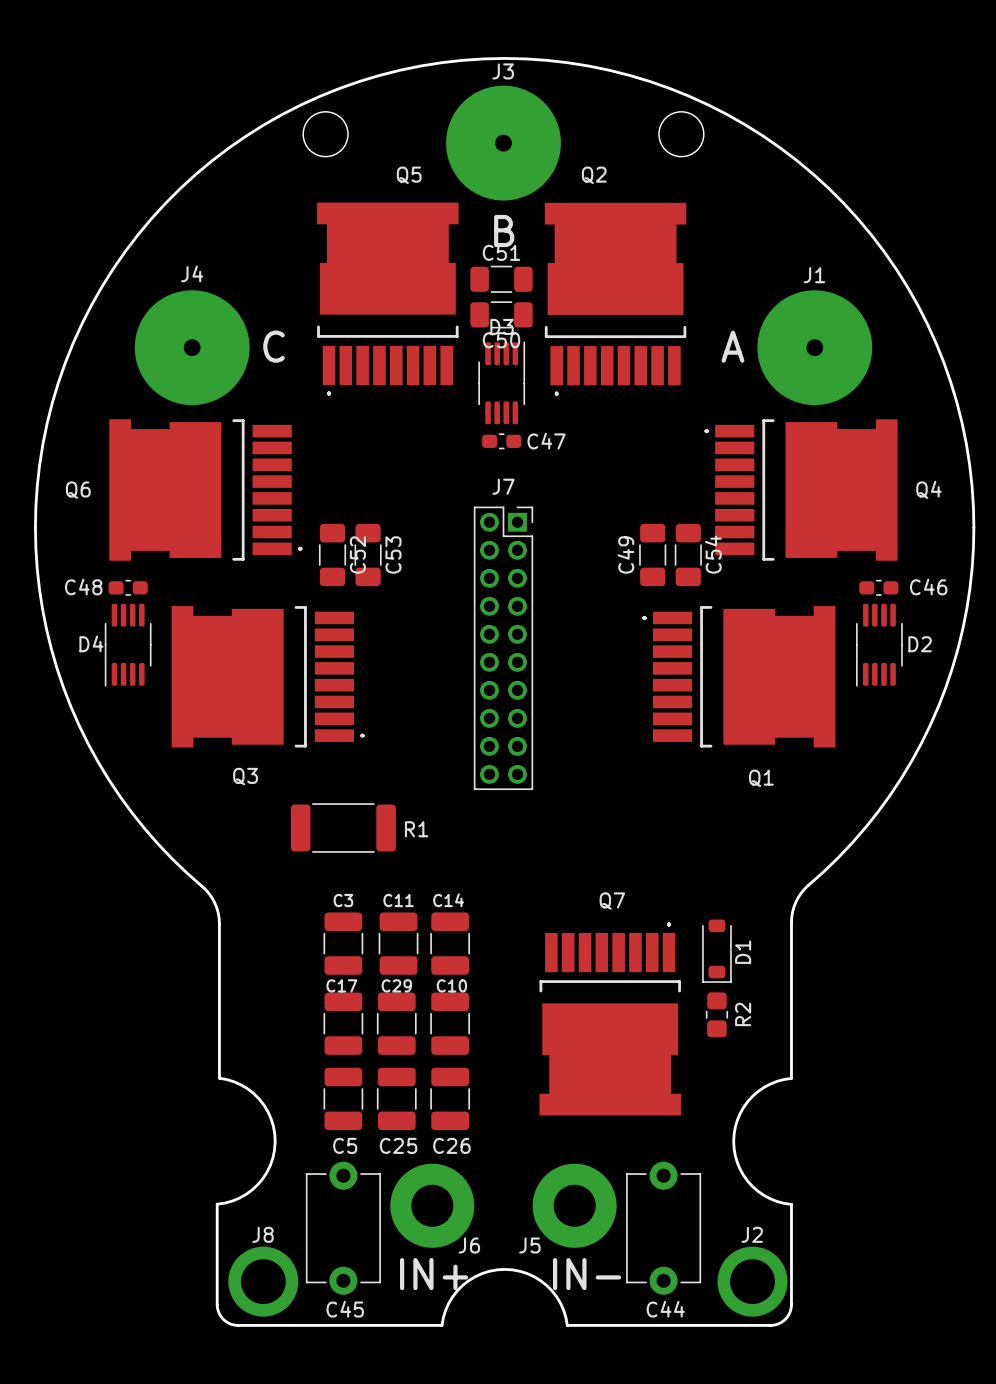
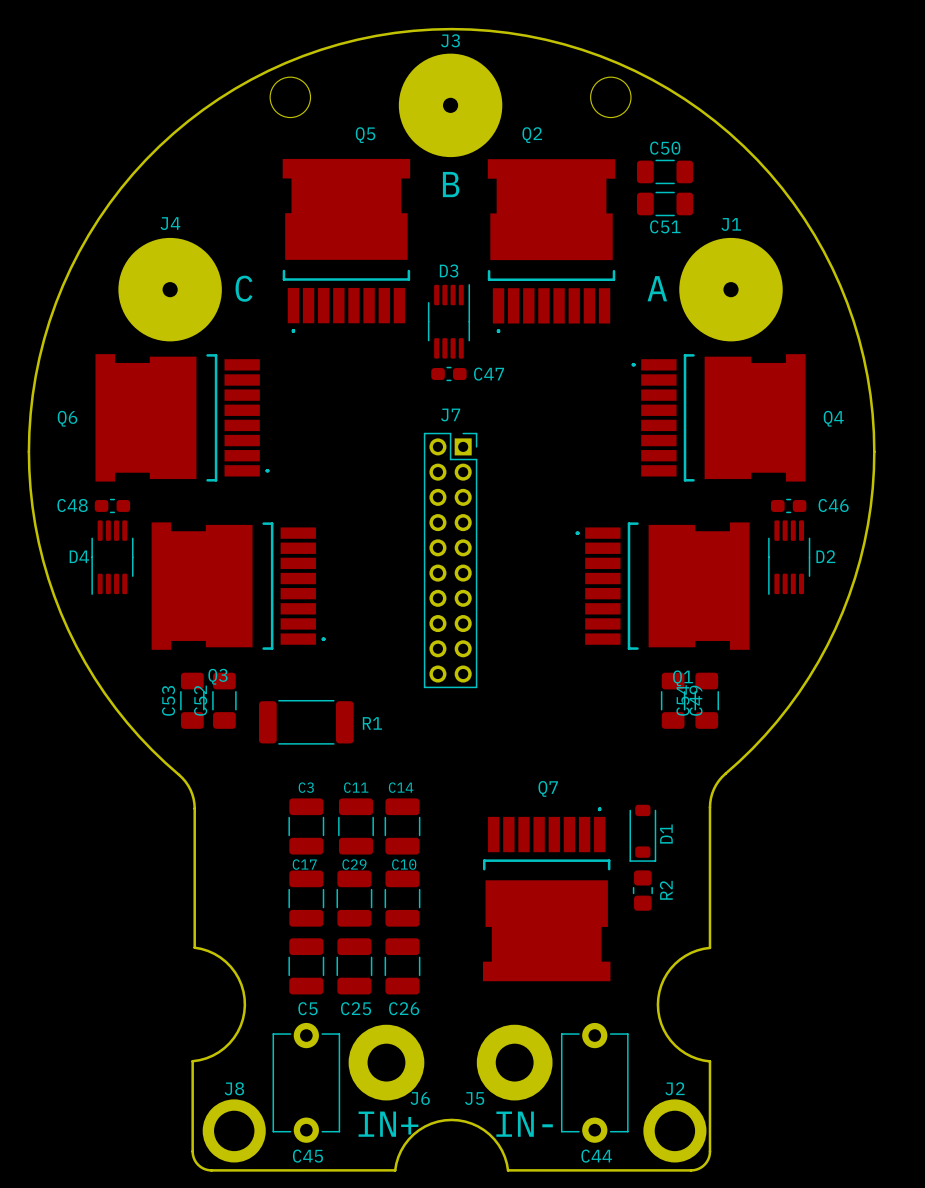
C51 name position: C51 (501, 252) -> C51 (665, 226)
C51 position: (501, 279) -> (665, 203)
C50 position: (501, 314) -> (665, 171)
C50 name position: C50 (501, 340) -> C50 (665, 148)
C54 name position: C54 (713, 554) -> C54 (682, 700)
C52 position: (332, 555) -> (224, 700)
C52 name position: C52 (357, 555) -> C52 (200, 700)
C53 position: (368, 555) -> (192, 700)
C53 name position: C53 (393, 555) -> C53 (168, 700)
C49 name position: C49 (625, 555) -> C49 (695, 700)
C49 position: (652, 555) -> (673, 700)
C54 position: (688, 555) -> (706, 700)

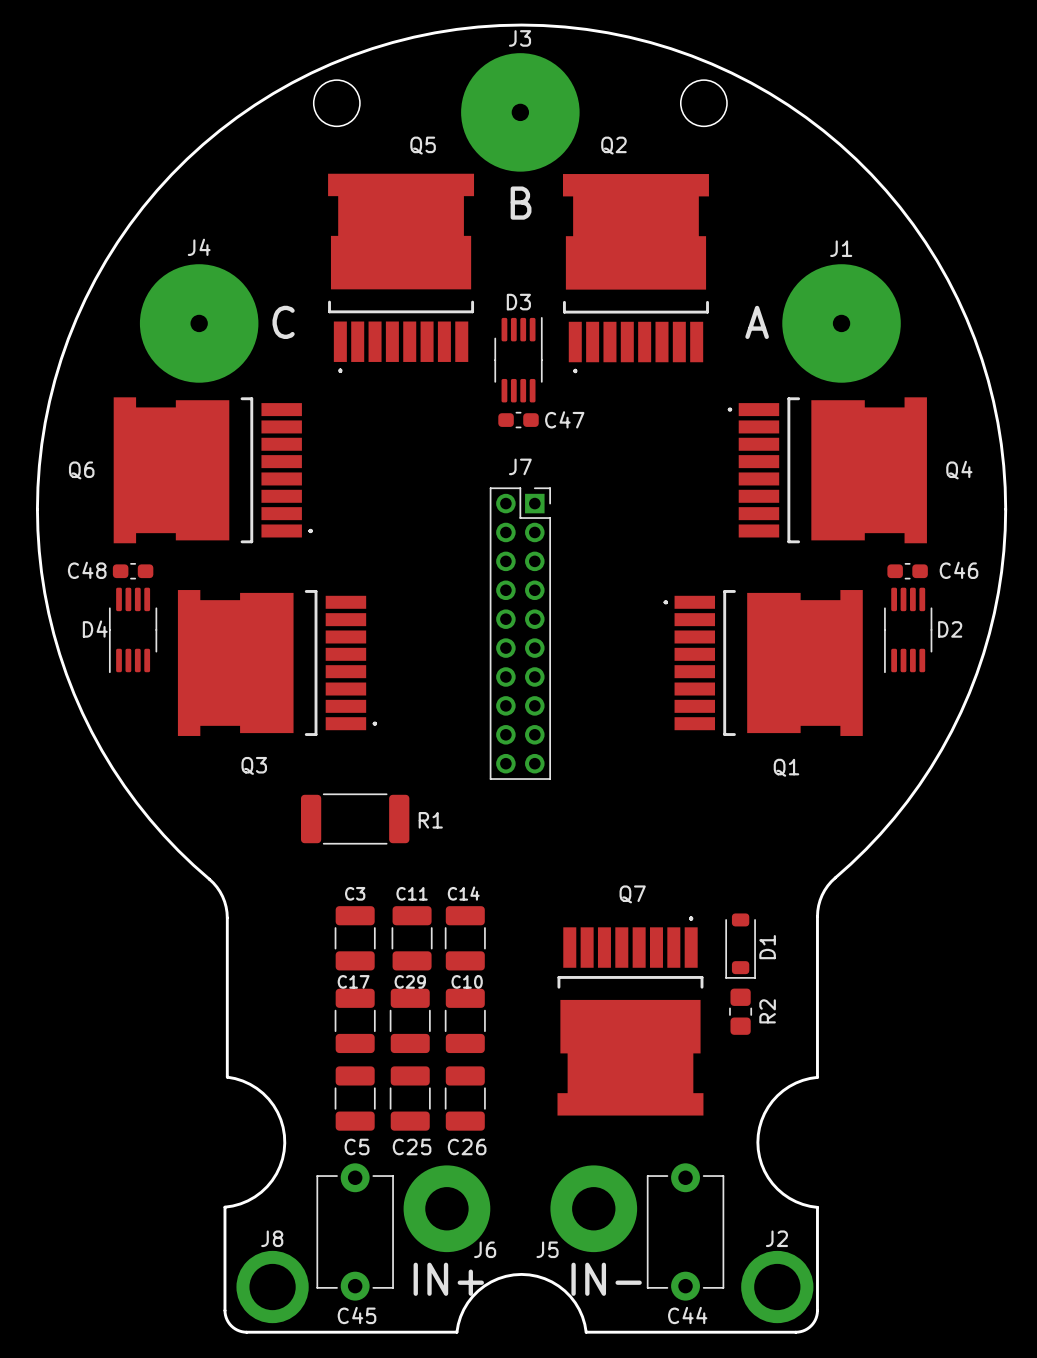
C50: (665, 171) -> none
C51: (665, 203) -> none
C53: (192, 700) -> none
C52: (224, 700) -> none
C49: (673, 700) -> none
C54: (706, 700) -> none

